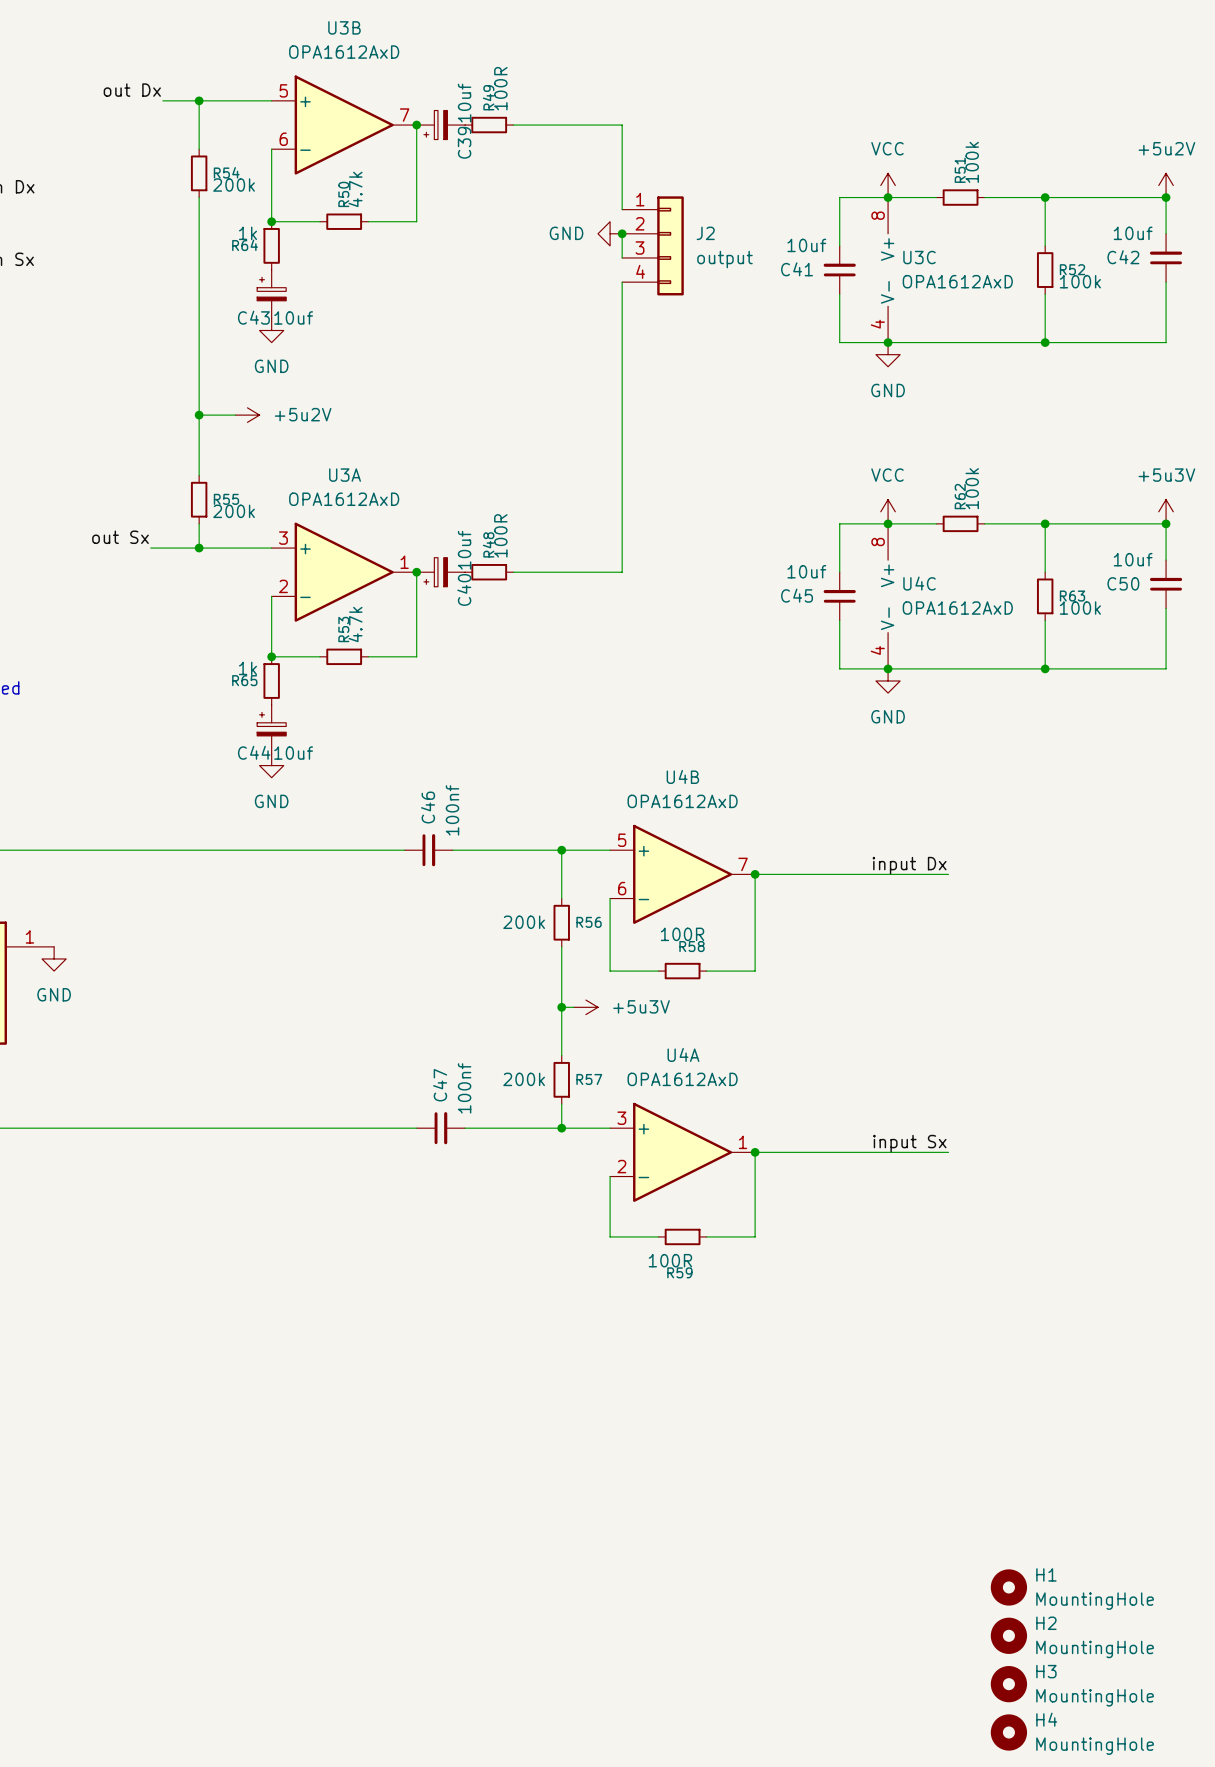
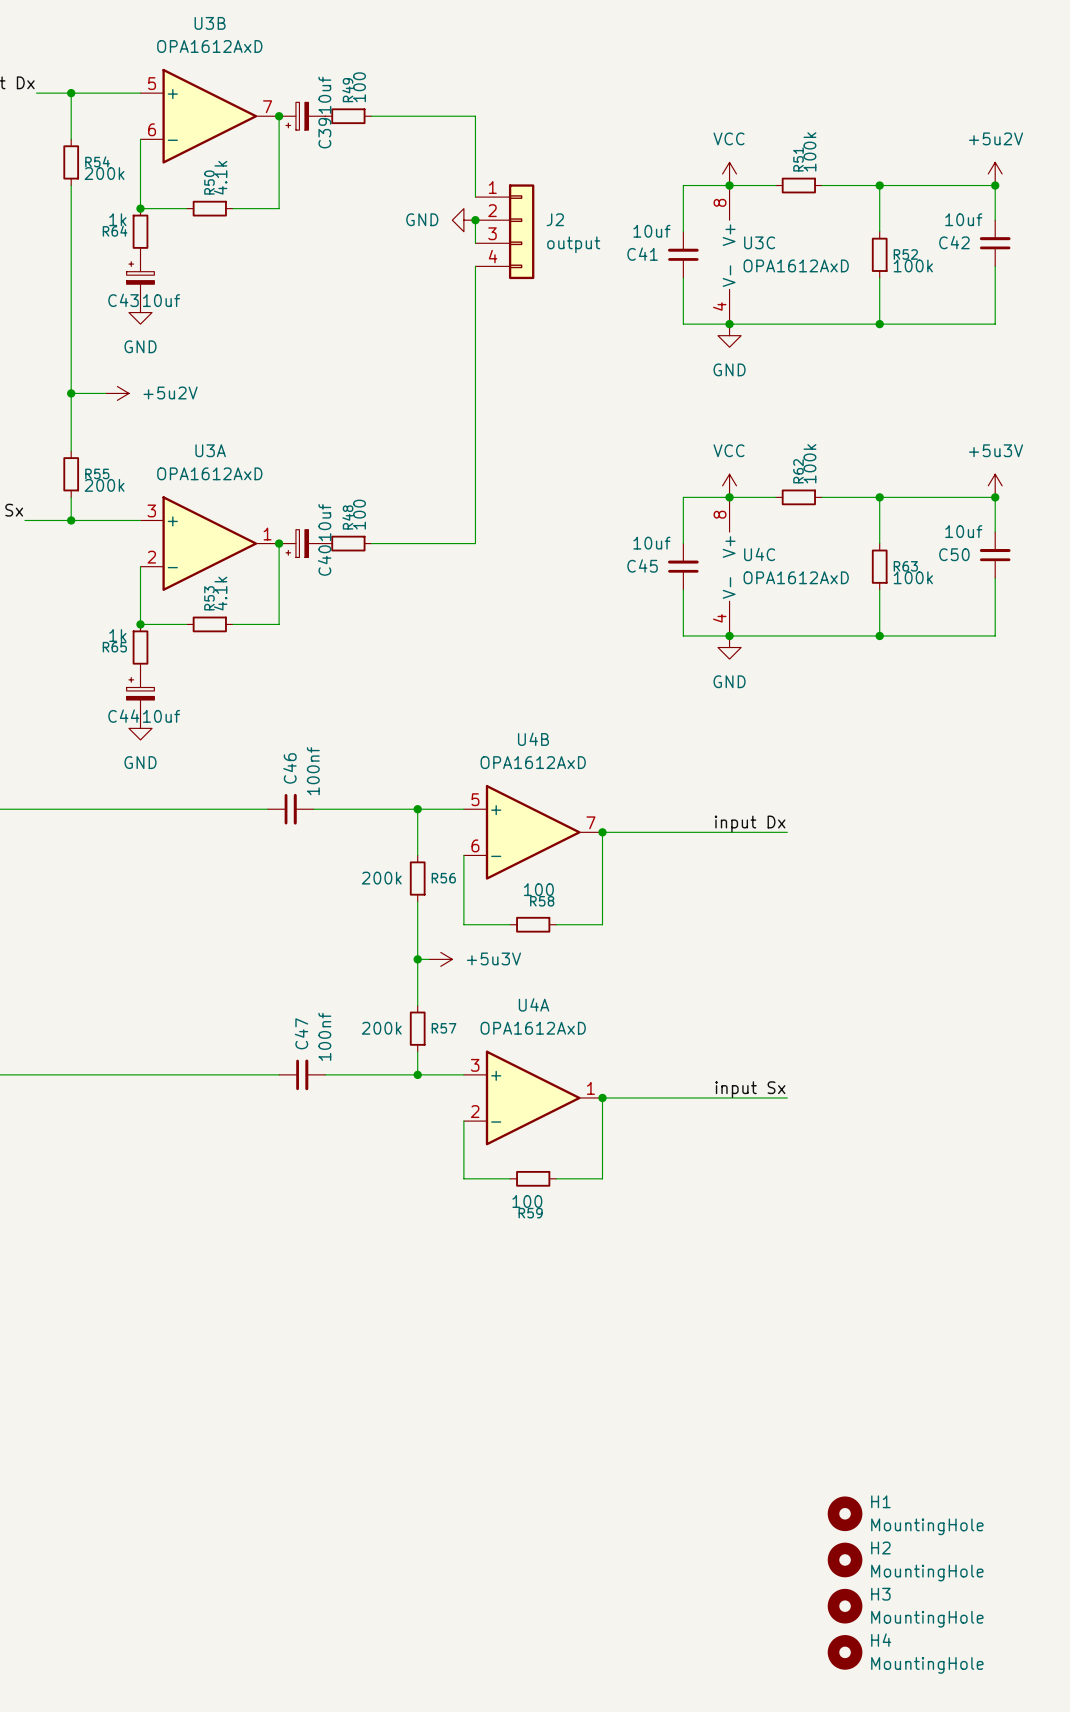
R49 value: 100R (500, 88) -> 100 (359, 87)
R50 value: 4.7k (355, 189) -> 4.1k (220, 177)
R48 value: 100R (500, 535) -> 100 (359, 514)
R53 value: 4.7k (355, 624) -> 4.1k (220, 593)
R58 value: 100R (682, 934) -> 100 (538, 889)
R59 value: 100R (670, 1260) -> 100 (527, 1201)

